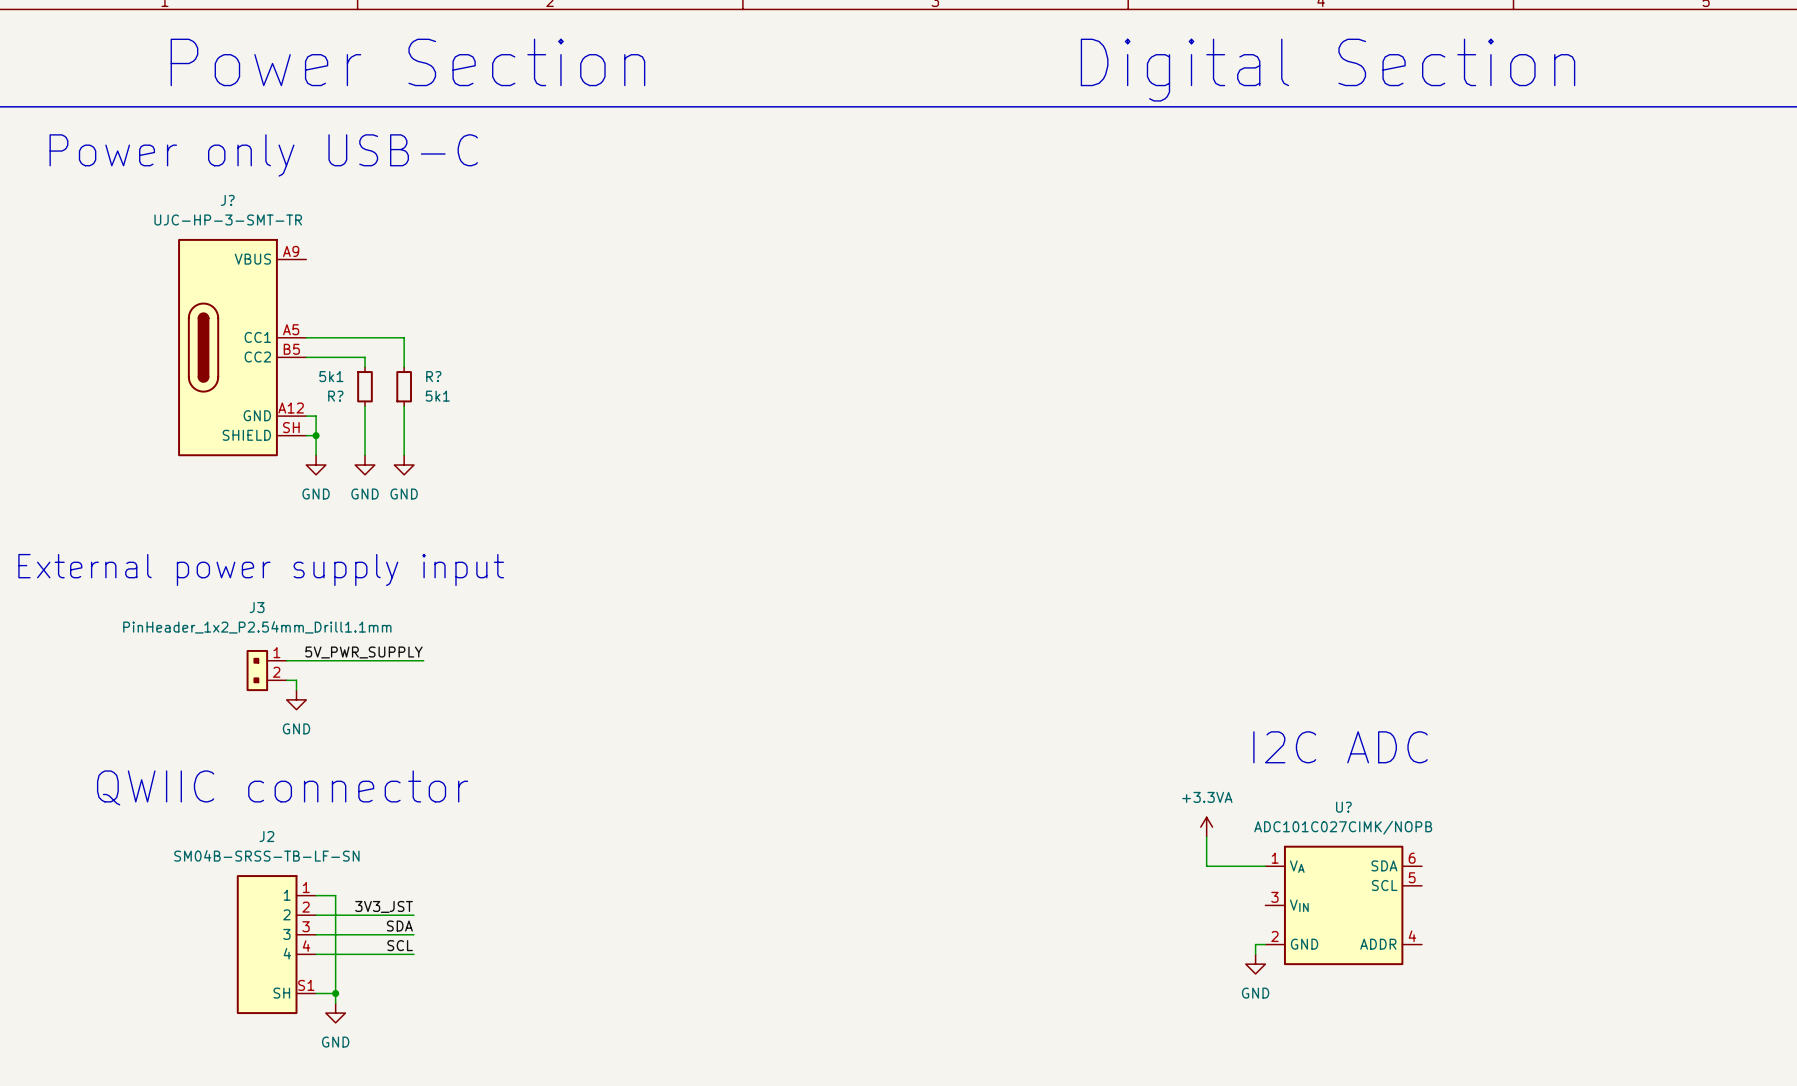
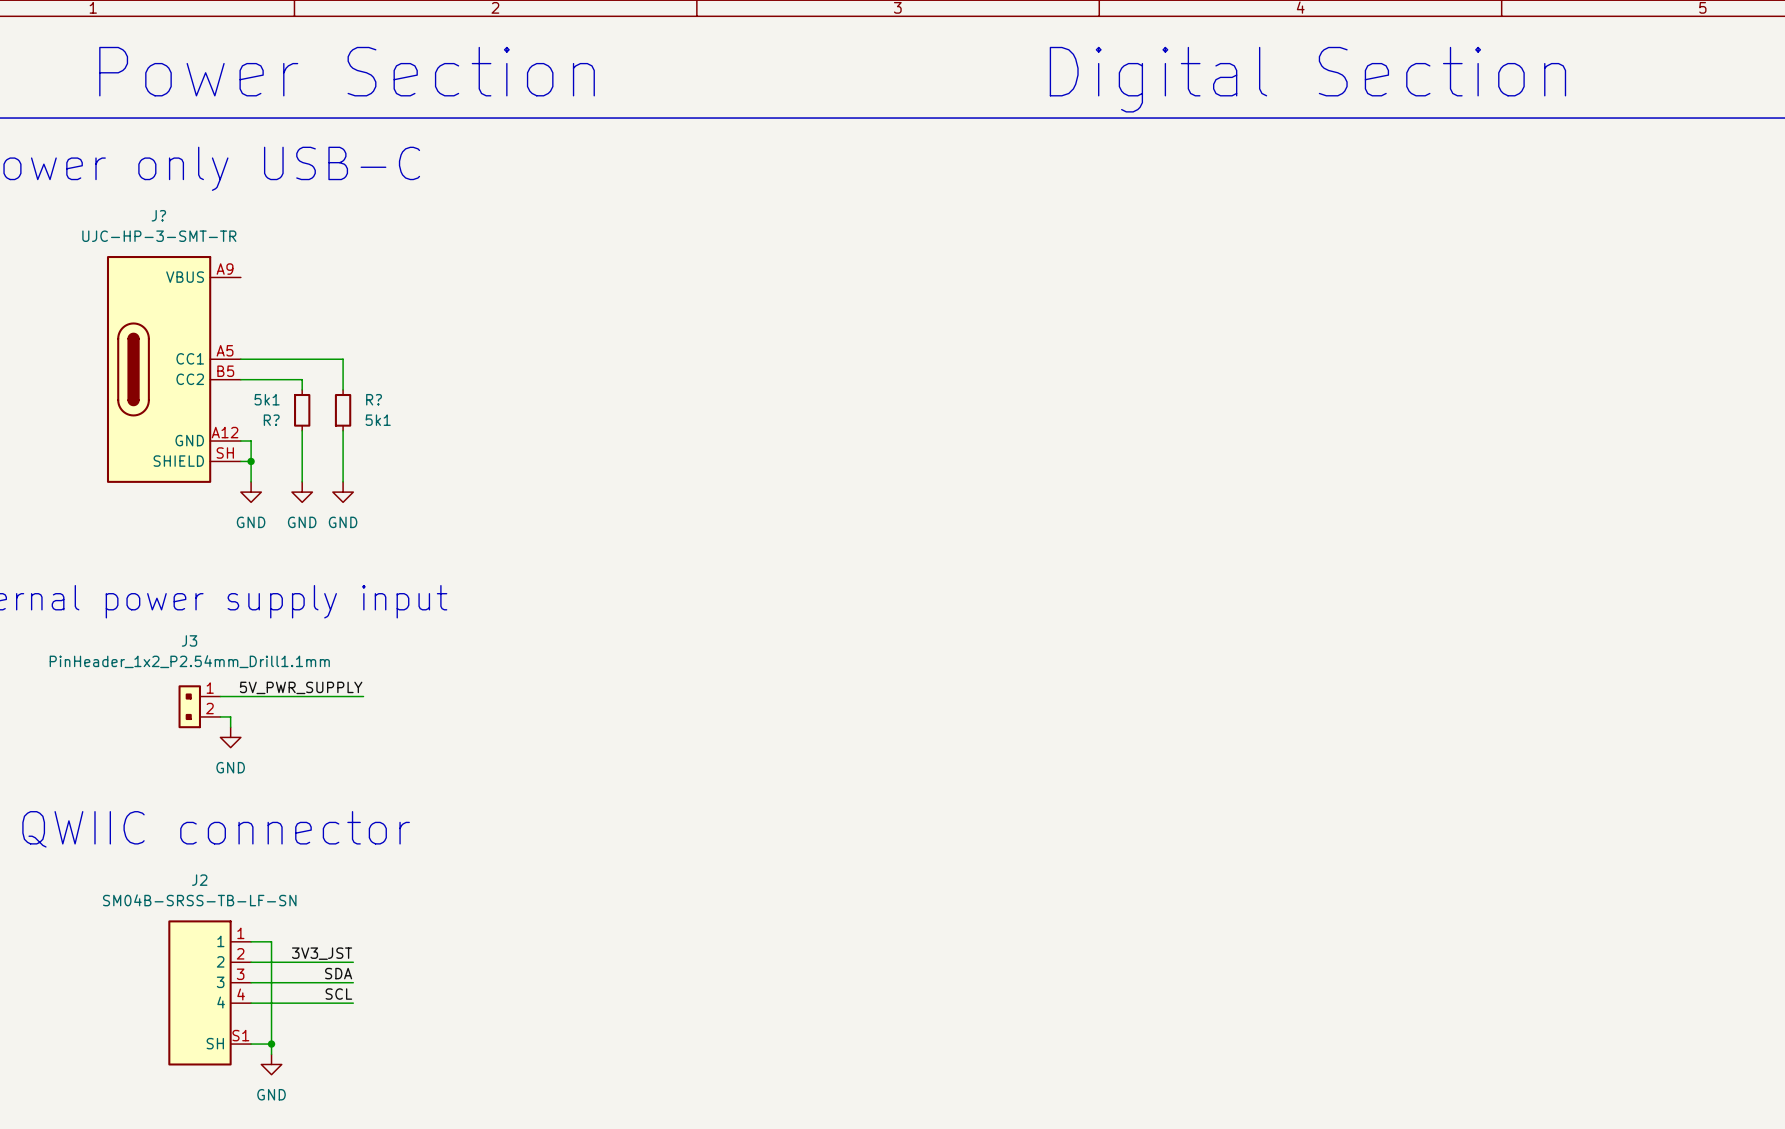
text: I2C ADC (1340, 747) -> none
power symbol: +3.3VA (1206, 827) -> none
wire: (1206, 836) (1206, 866) (1265, 866) -> none
U?: (1343, 905) -> none
wire: (1265, 944) (1255, 944) (1255, 954) -> none
power symbol: GND (1255, 964) -> none

